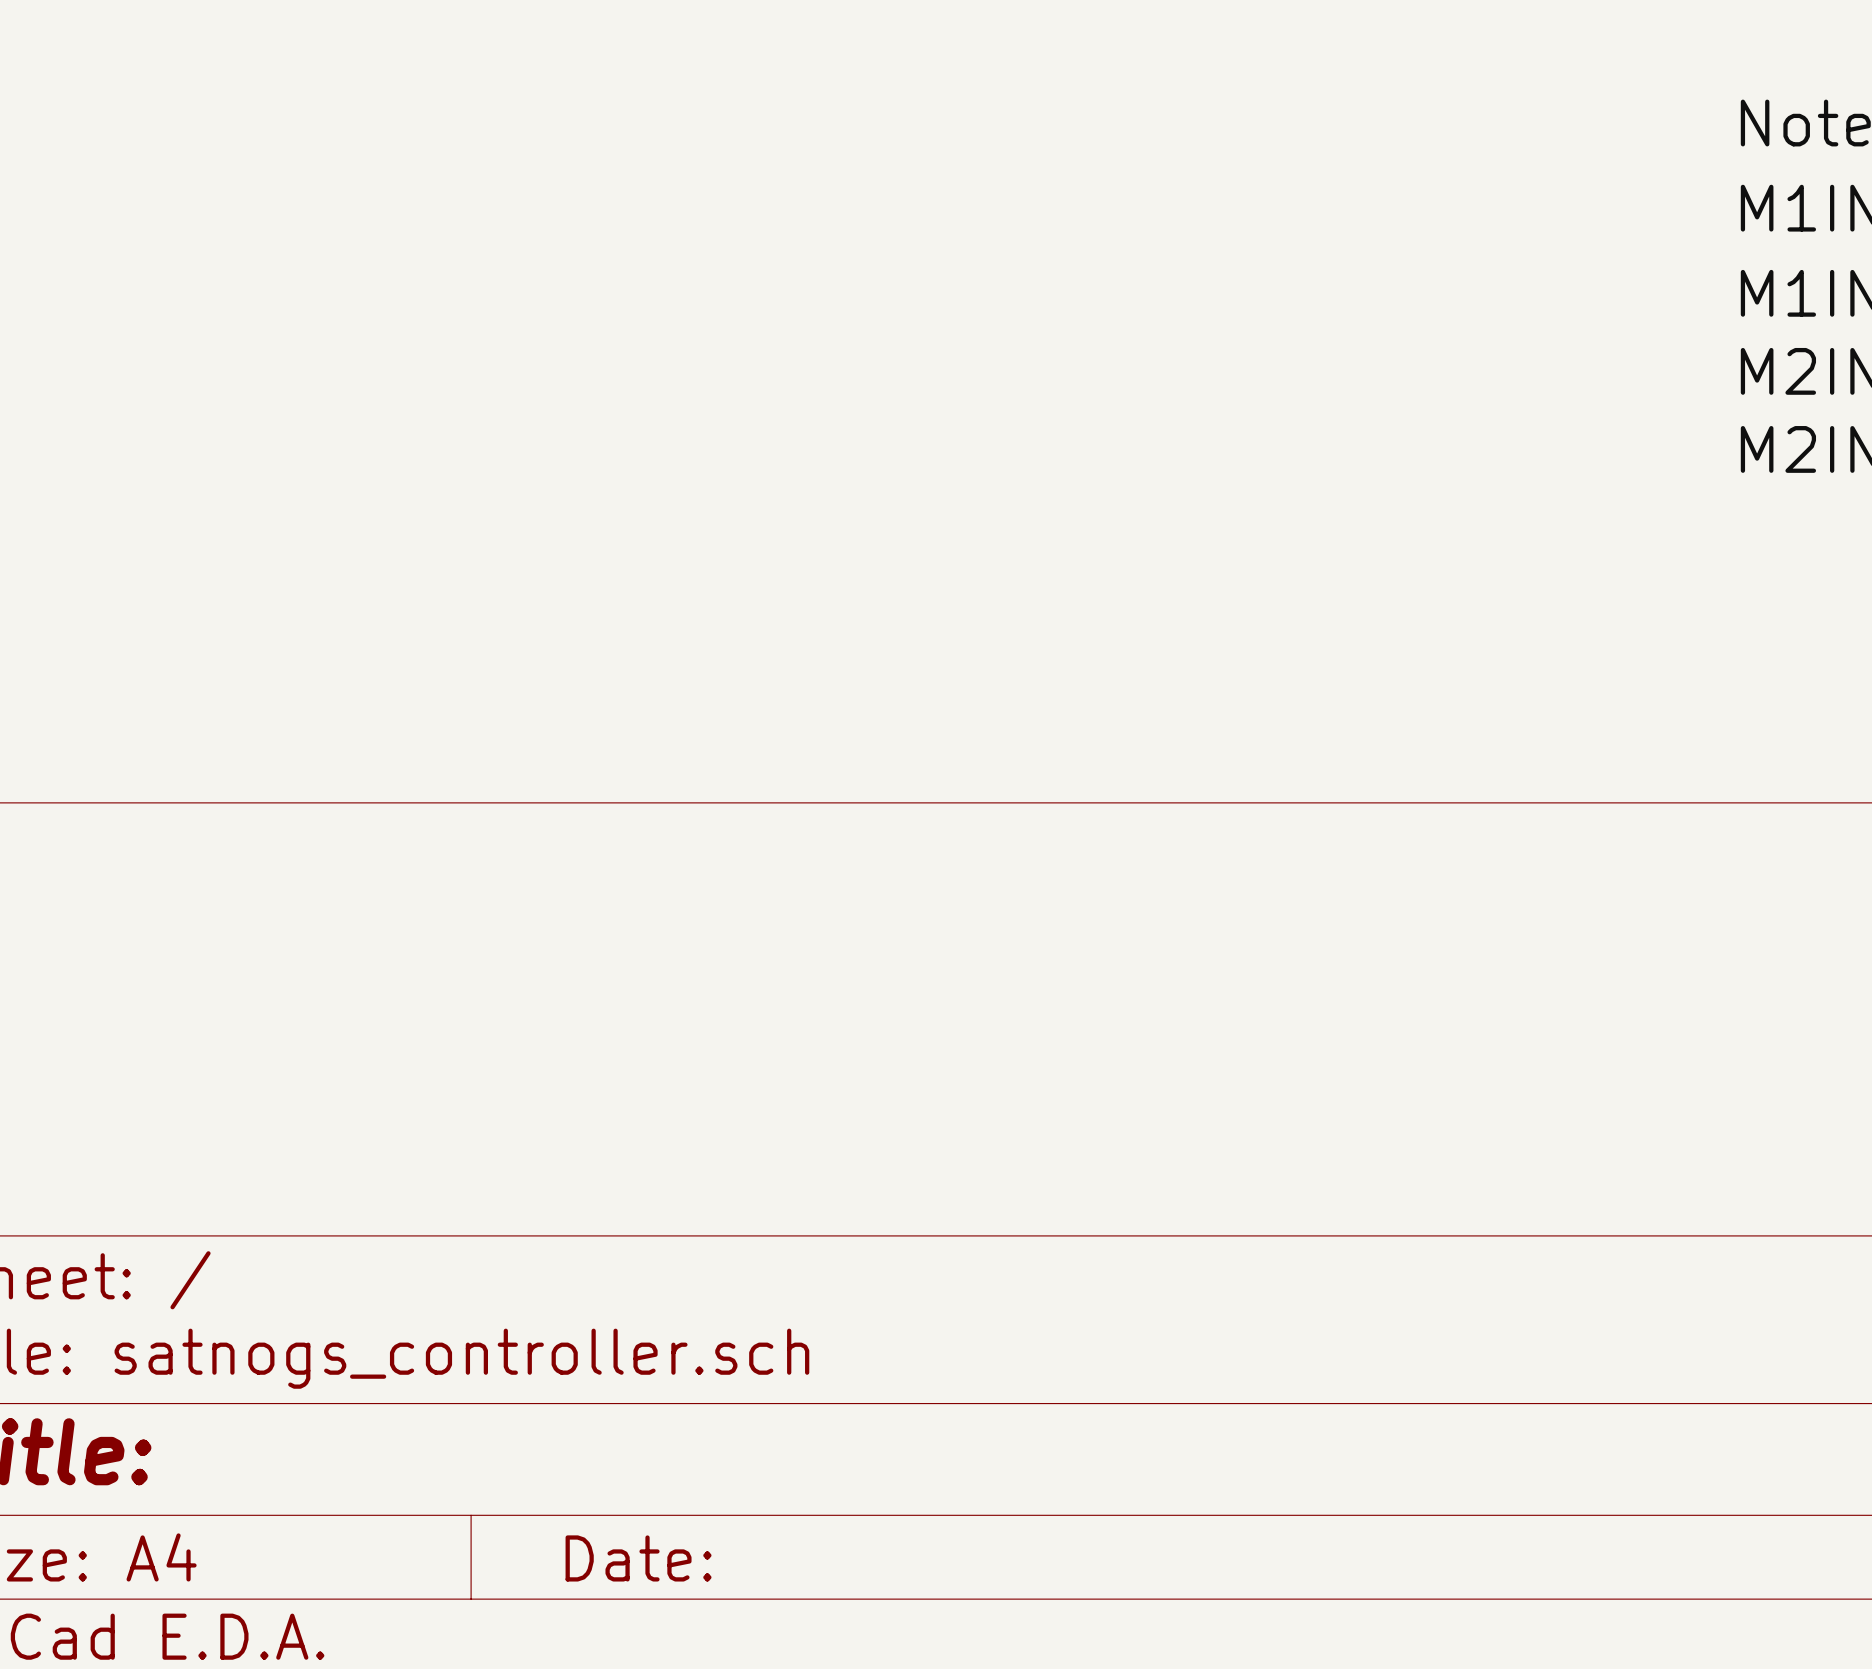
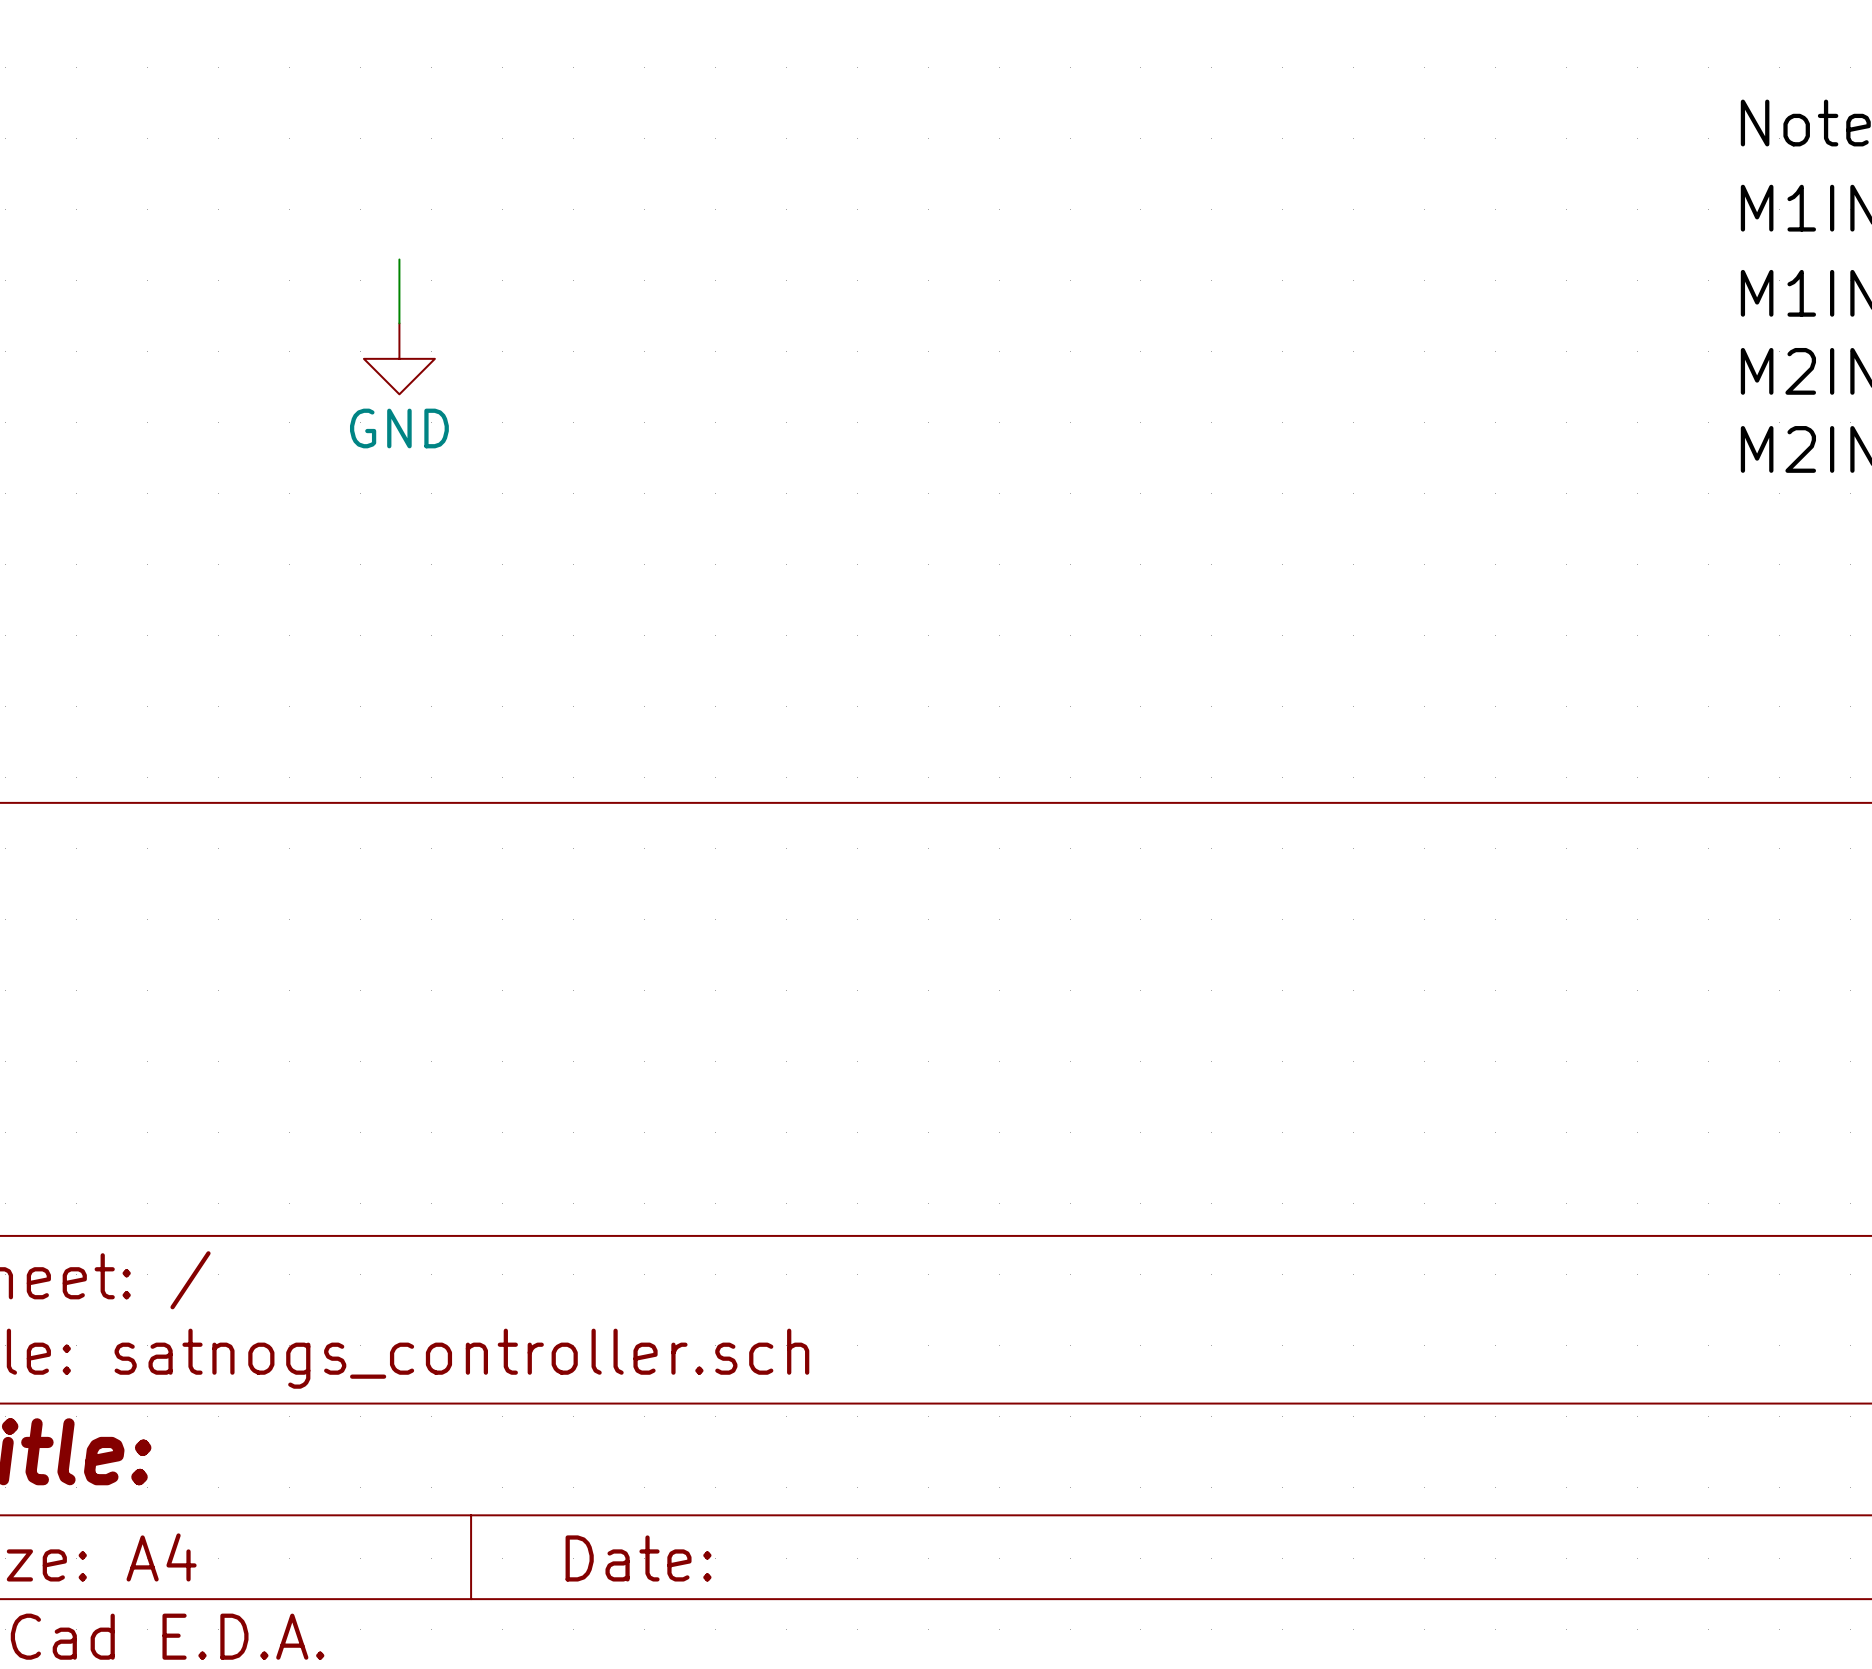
wire: none -> (399, 259) (399, 323)
power symbol: none -> GND (399, 358)

